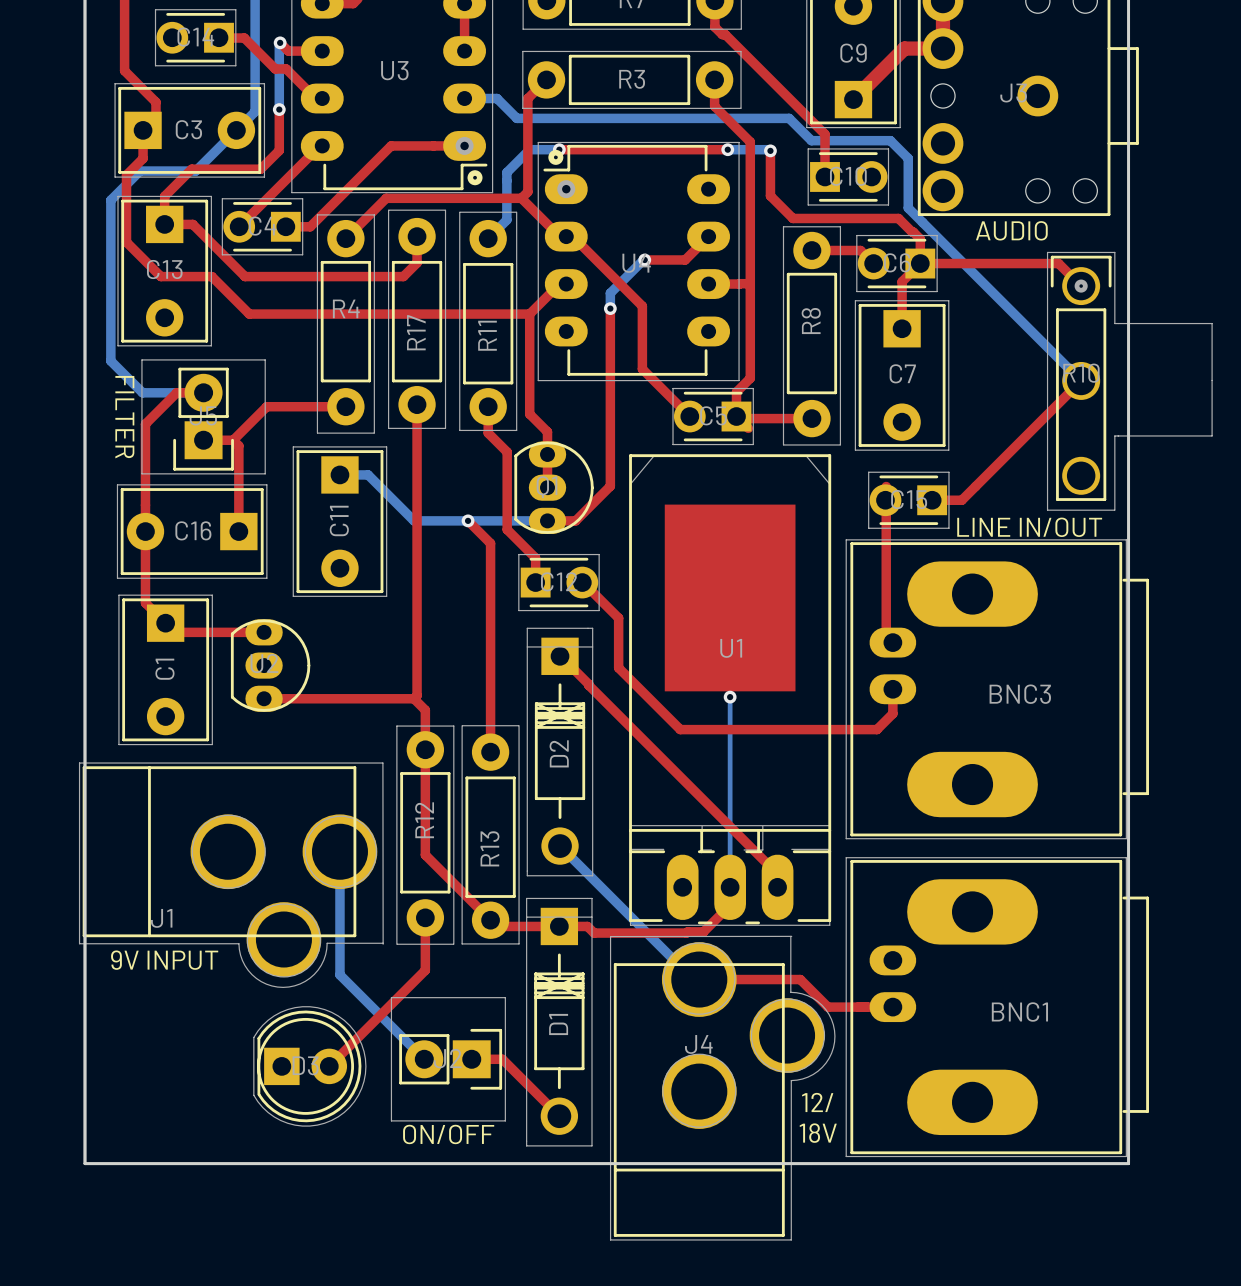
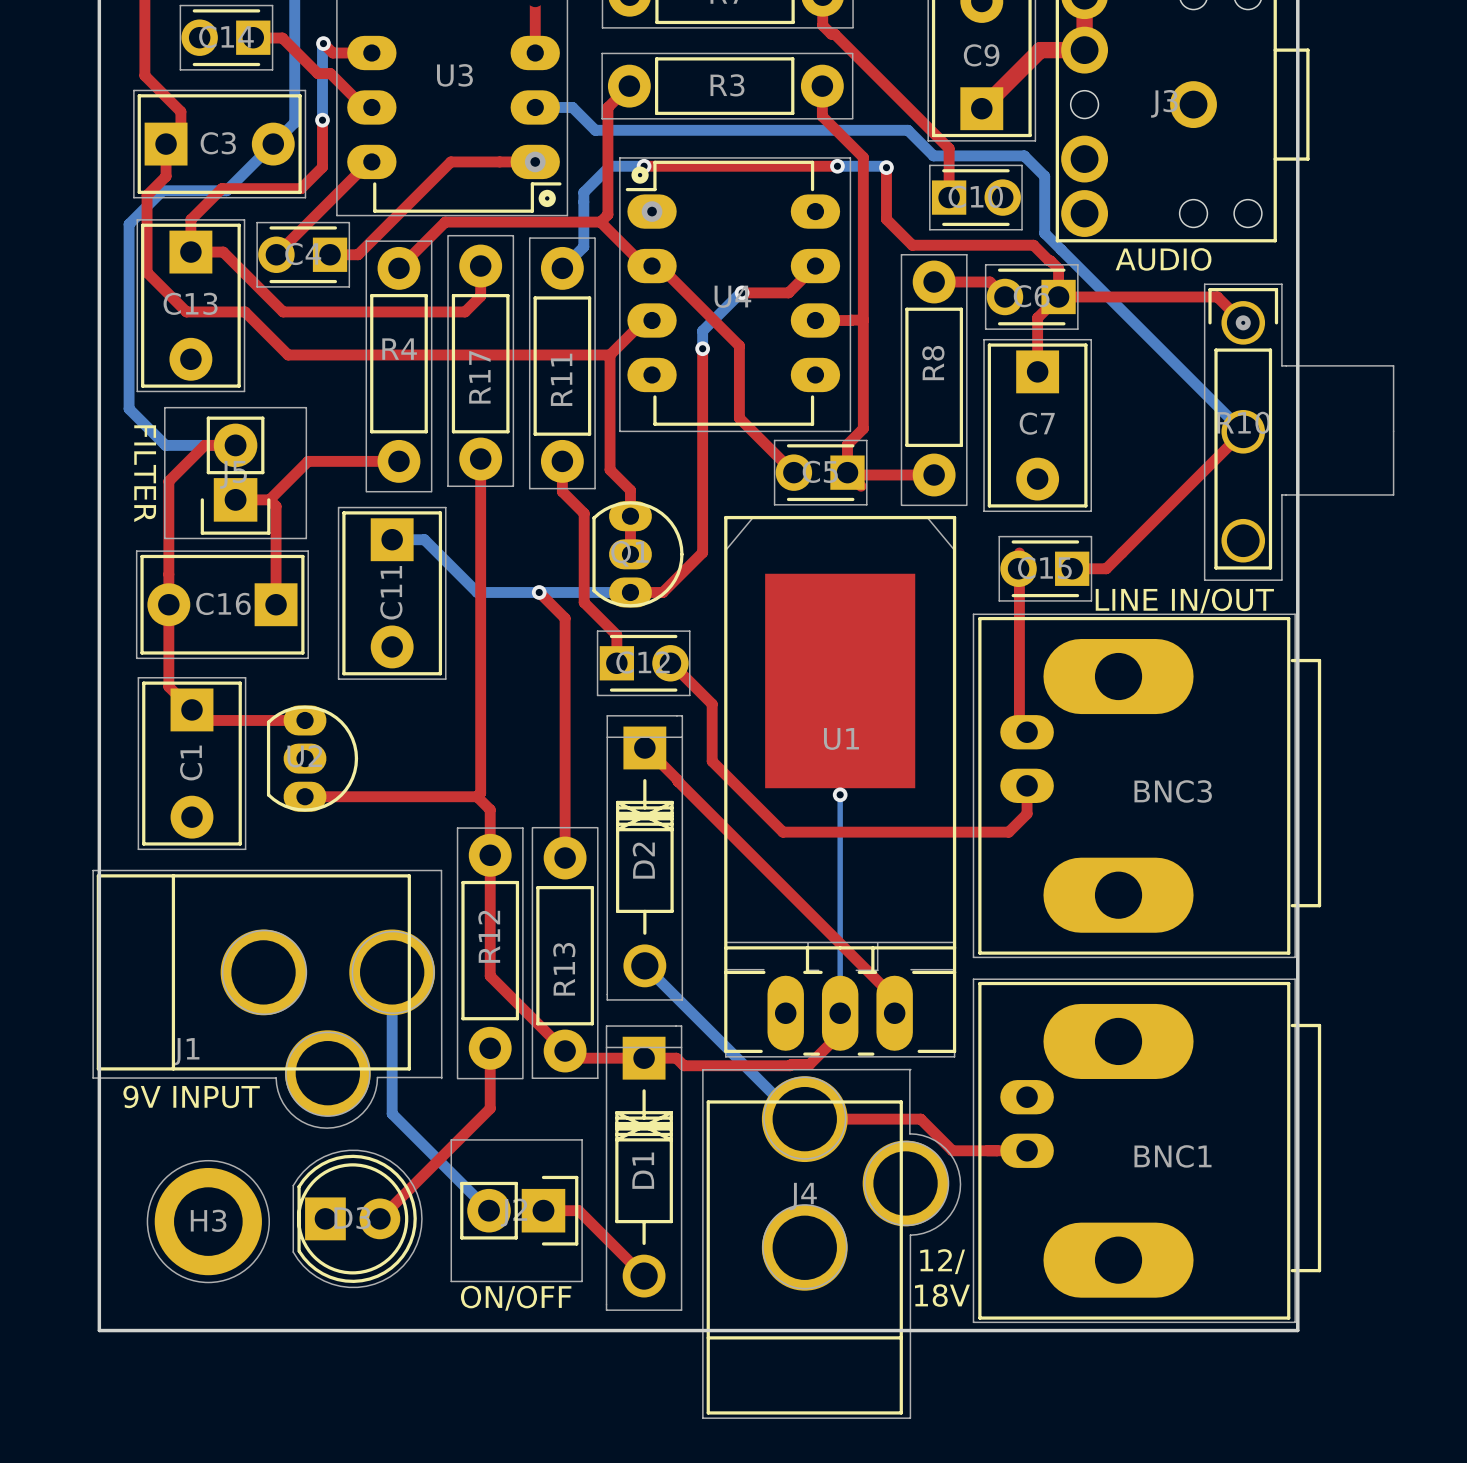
H3: none -> (208, 1221)

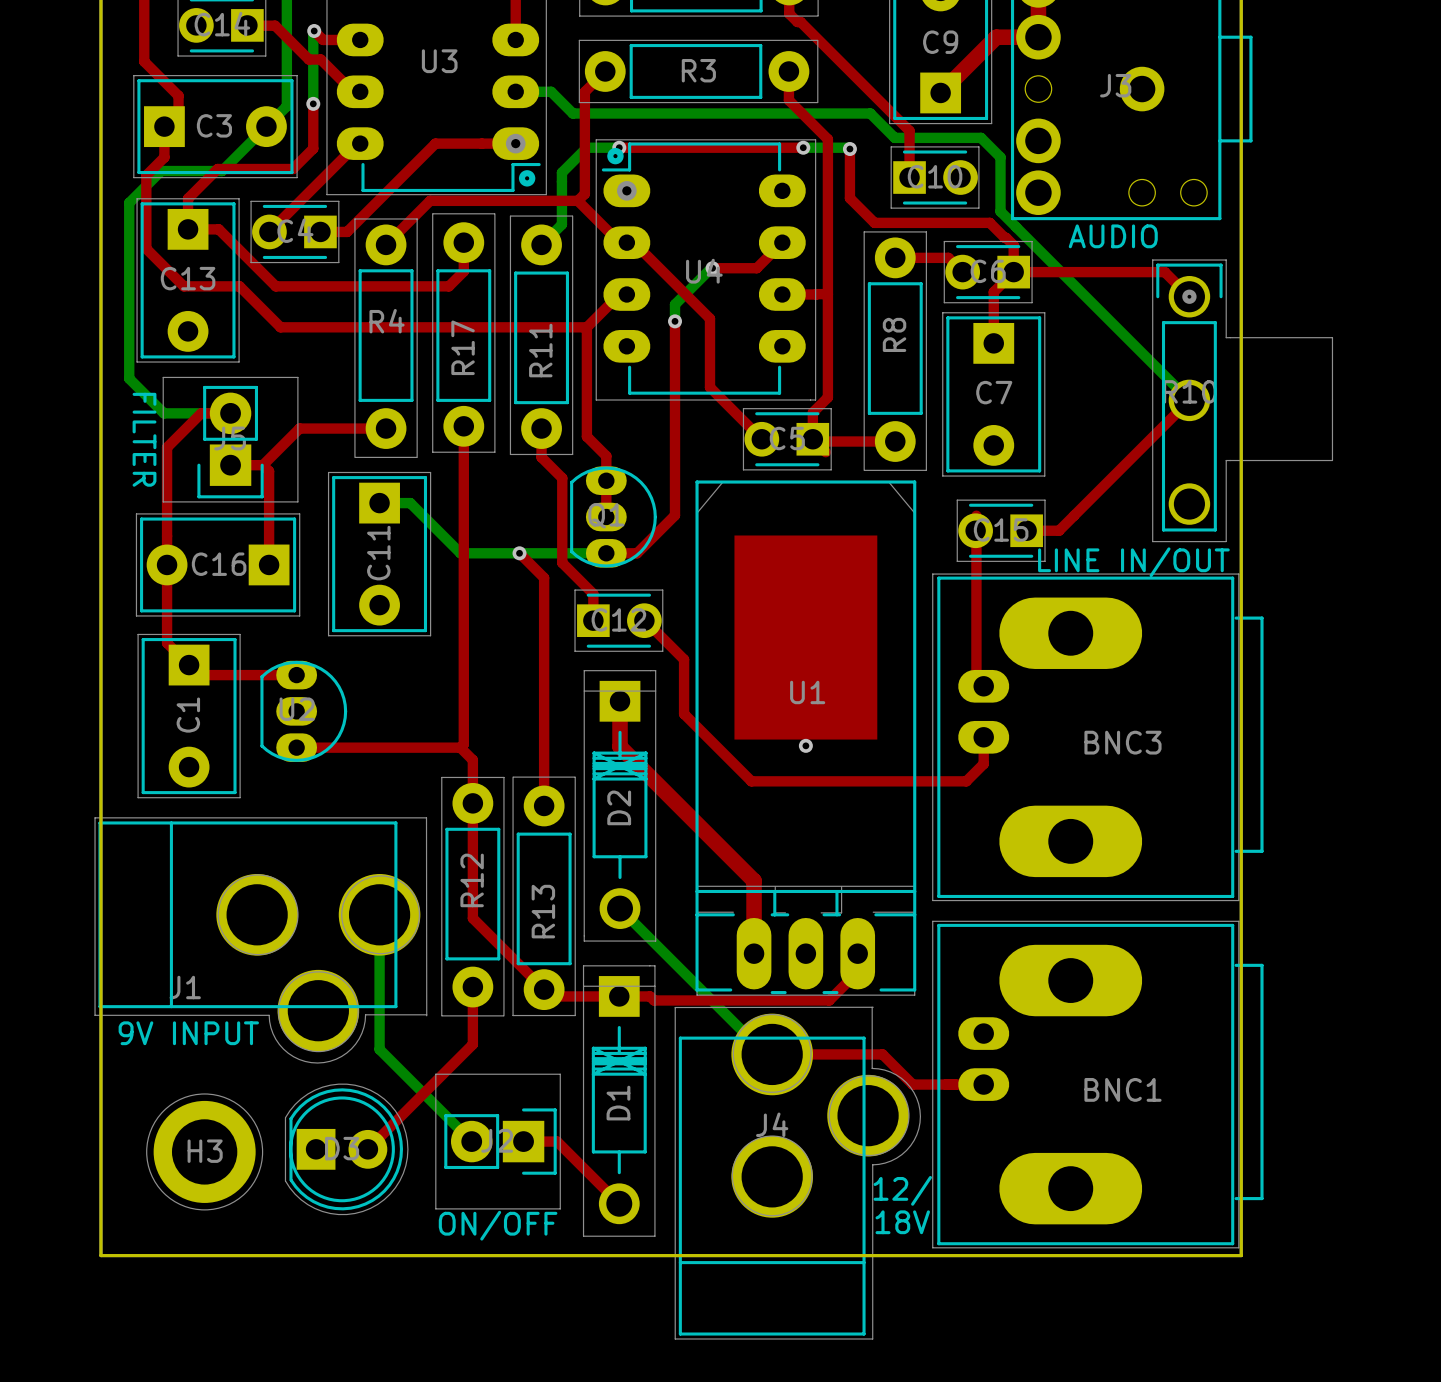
top track: none -> (620, 701) (620, 746) (754, 880) (754, 953)
top track: (645, 747) (893, 996) -> none
bottom track: (840, 794) (840, 1013) -> none
top track: (838, 1035) (809, 1064) (683, 1065) (680, 1062) -> (857, 953) (857, 972) (829, 1000) (654, 1000)

